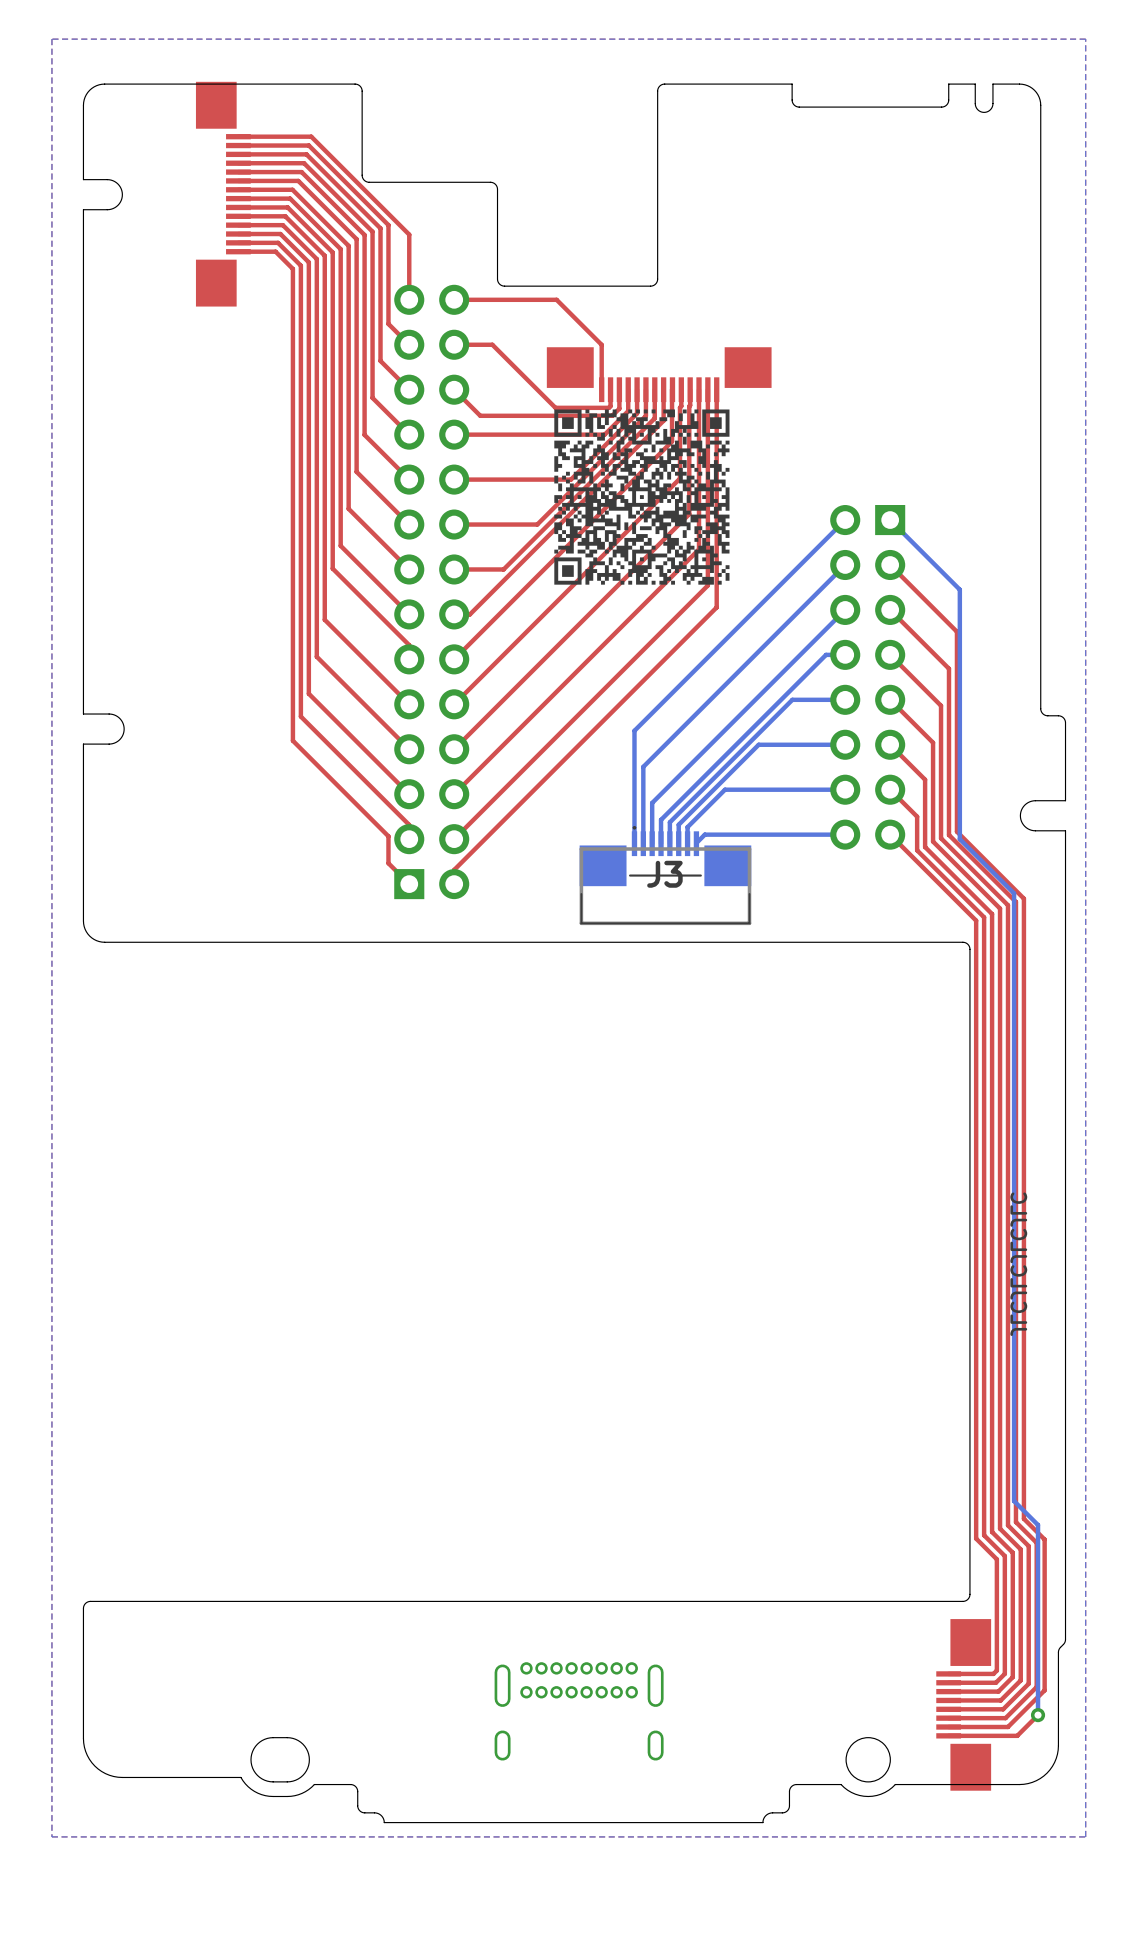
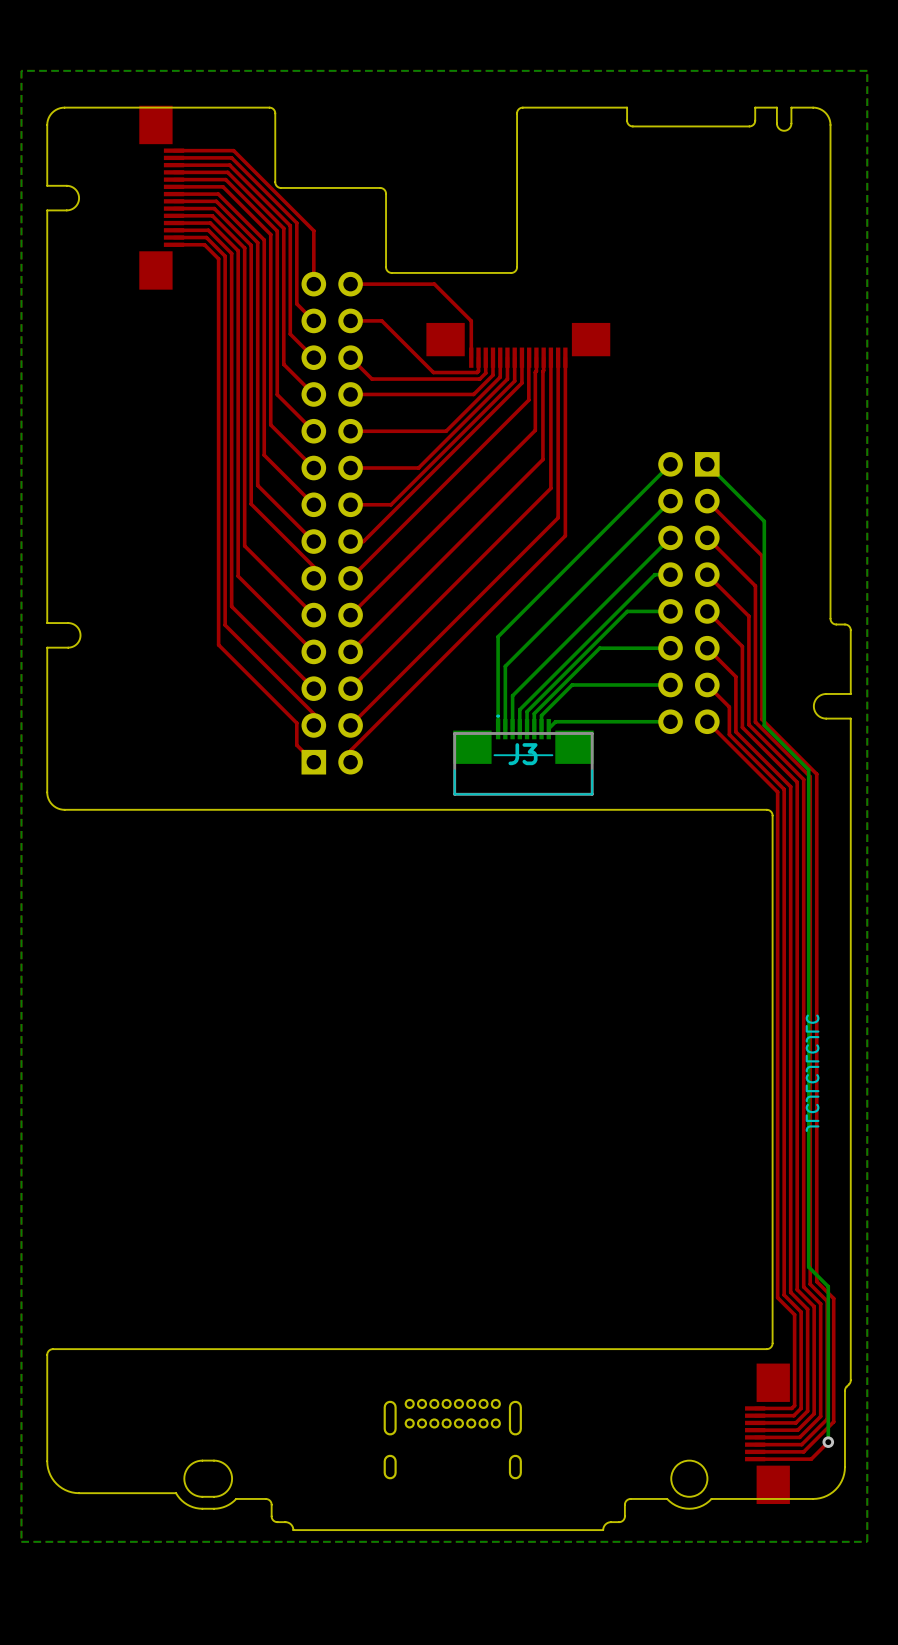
drawing: [554, 409, 730, 585] -> none

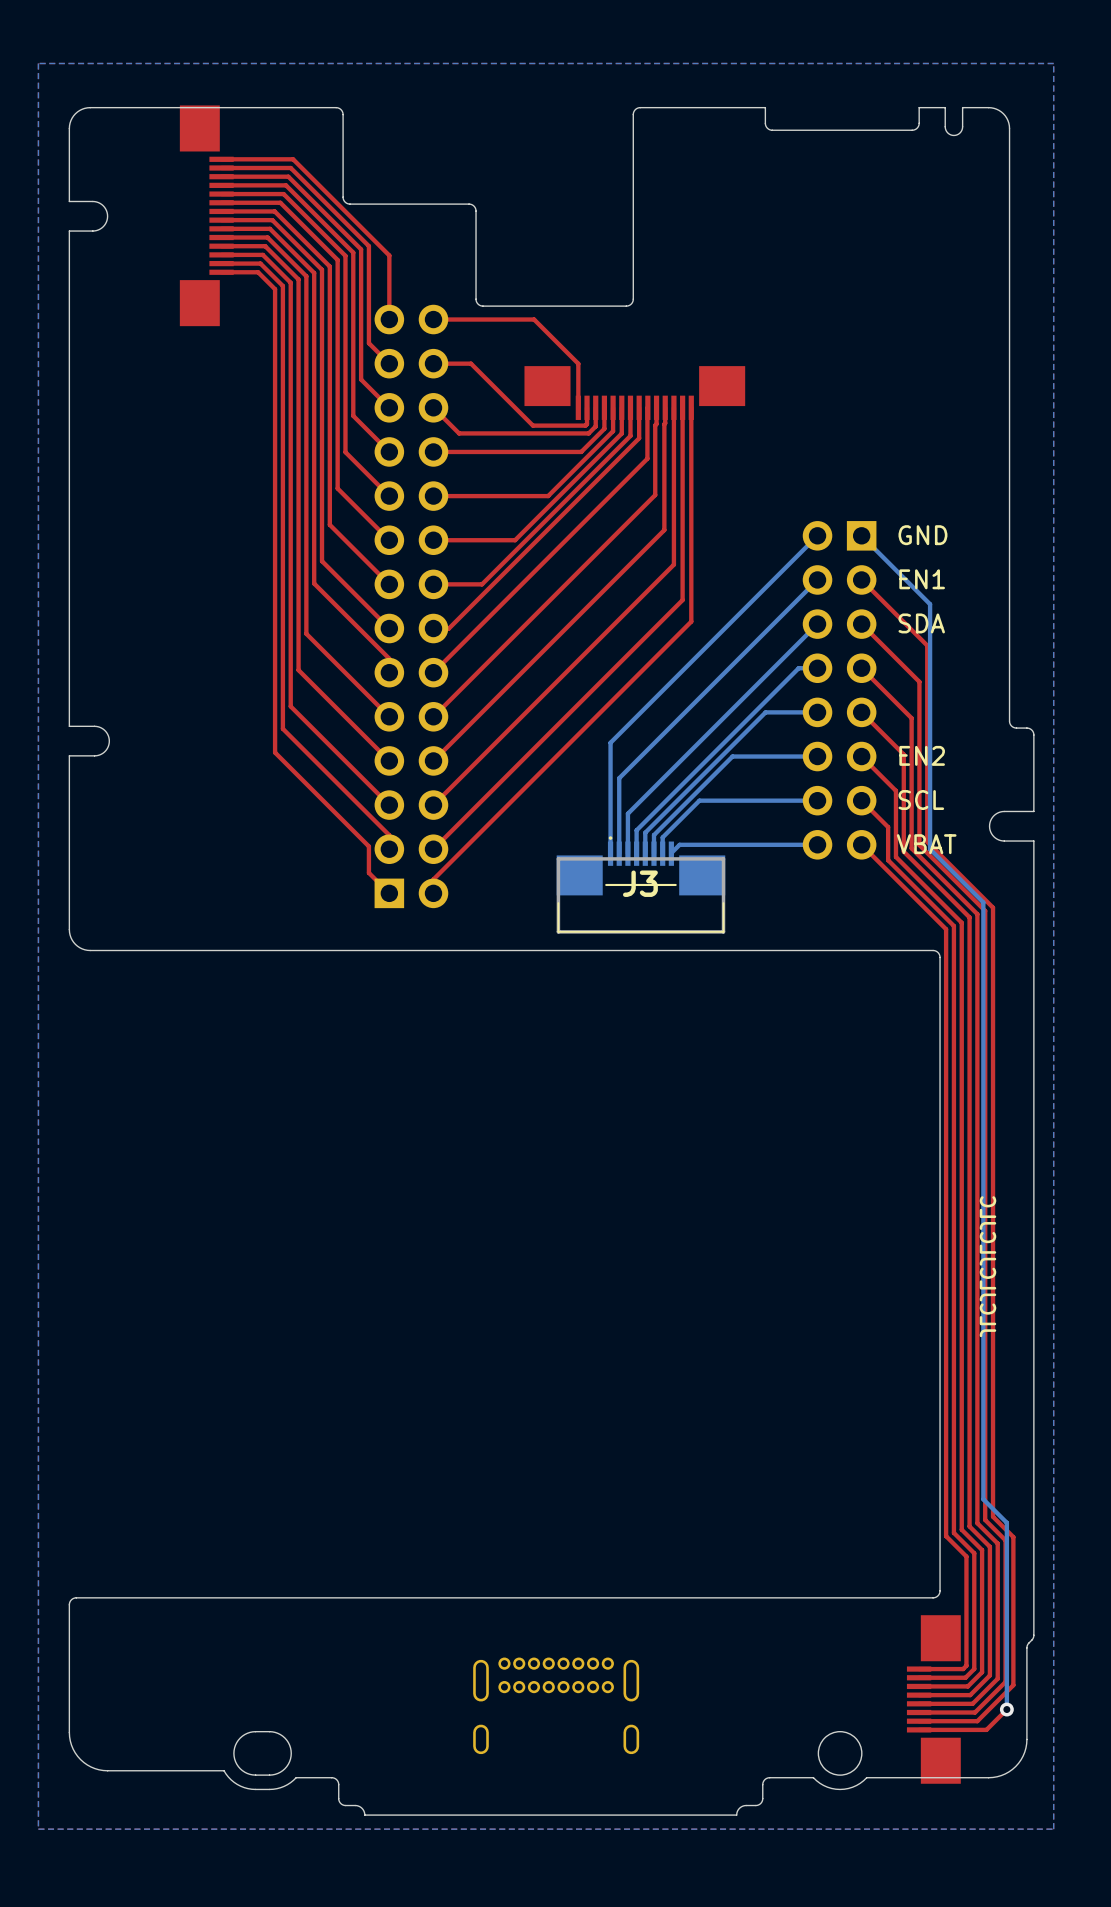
text: none -> GND (922, 535)
text: none -> EN1 (922, 579)
text: none -> SDA (921, 623)
text: none -> EN2 (922, 755)
text: none -> SCL (921, 800)
text: none -> VBAT (926, 844)

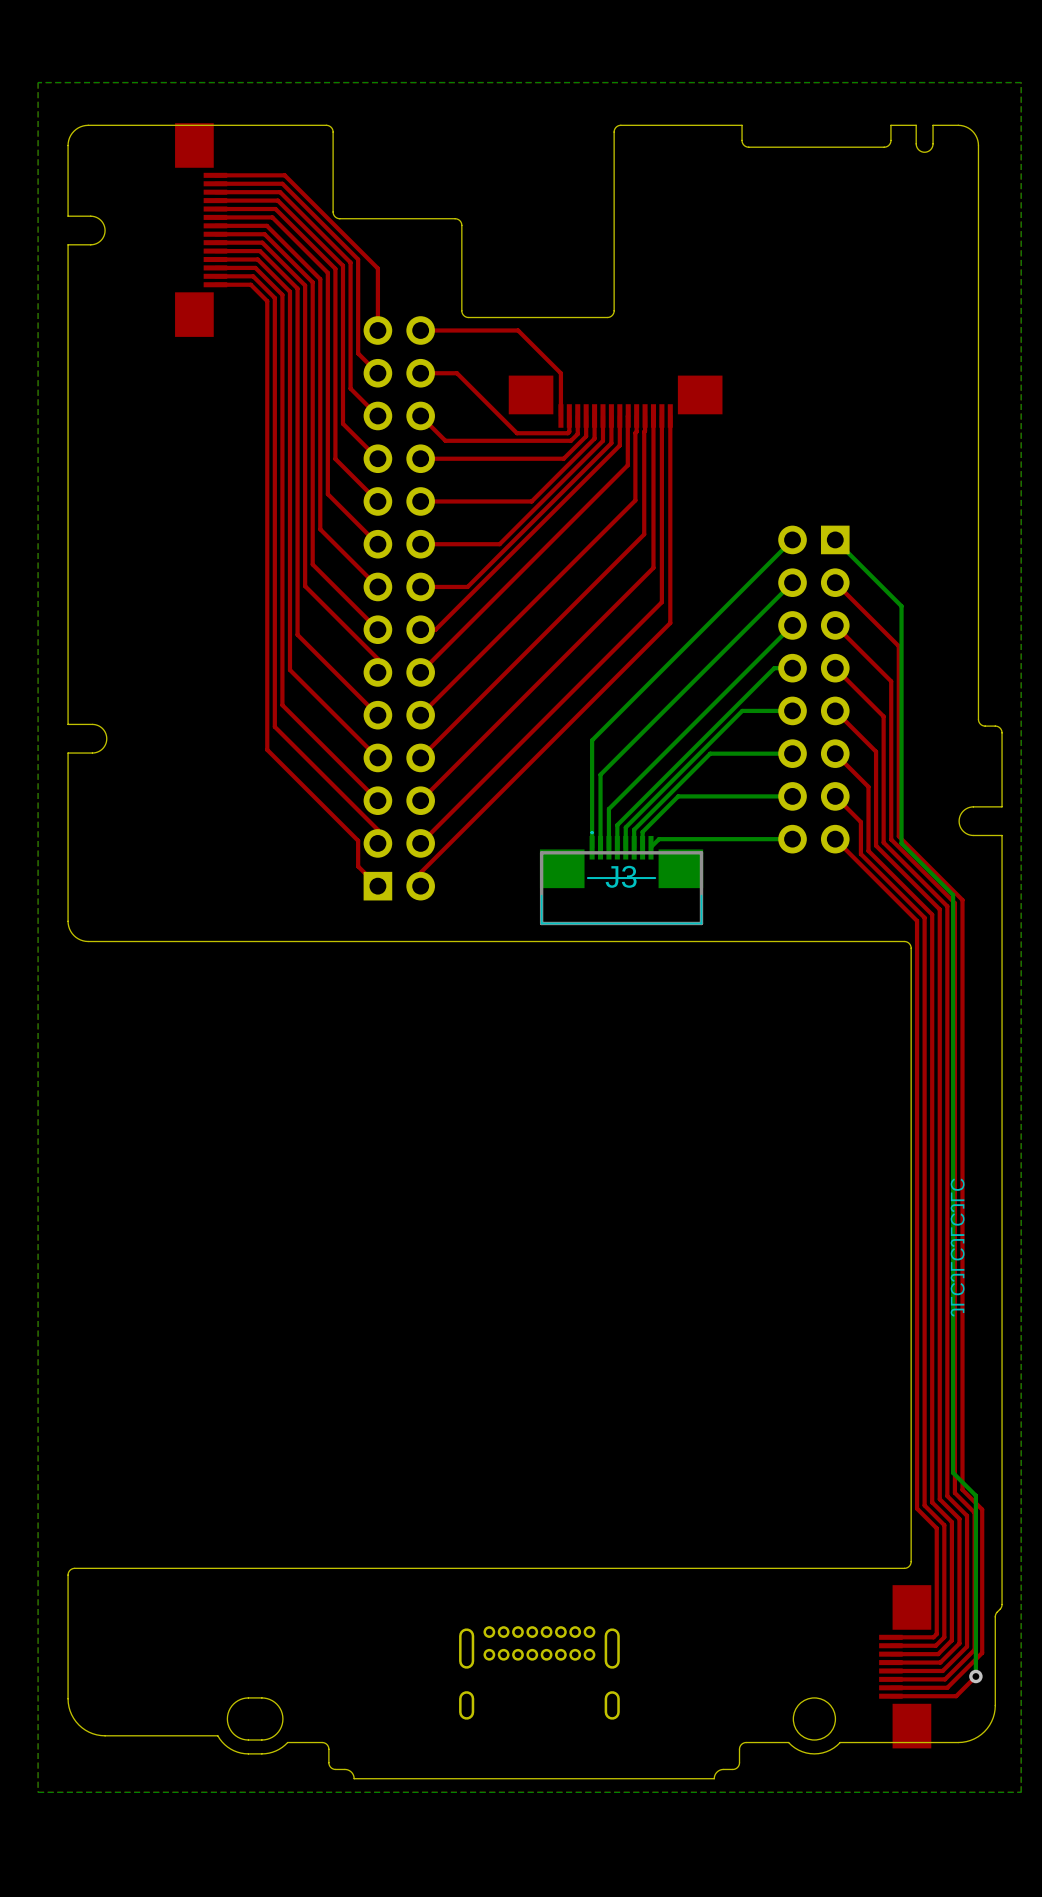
text: GND (922, 535) -> none
text: EN1 (922, 579) -> none
text: SDA (921, 623) -> none
text: EN2 (922, 755) -> none
text: SCL (921, 800) -> none
text: VBAT (926, 844) -> none

